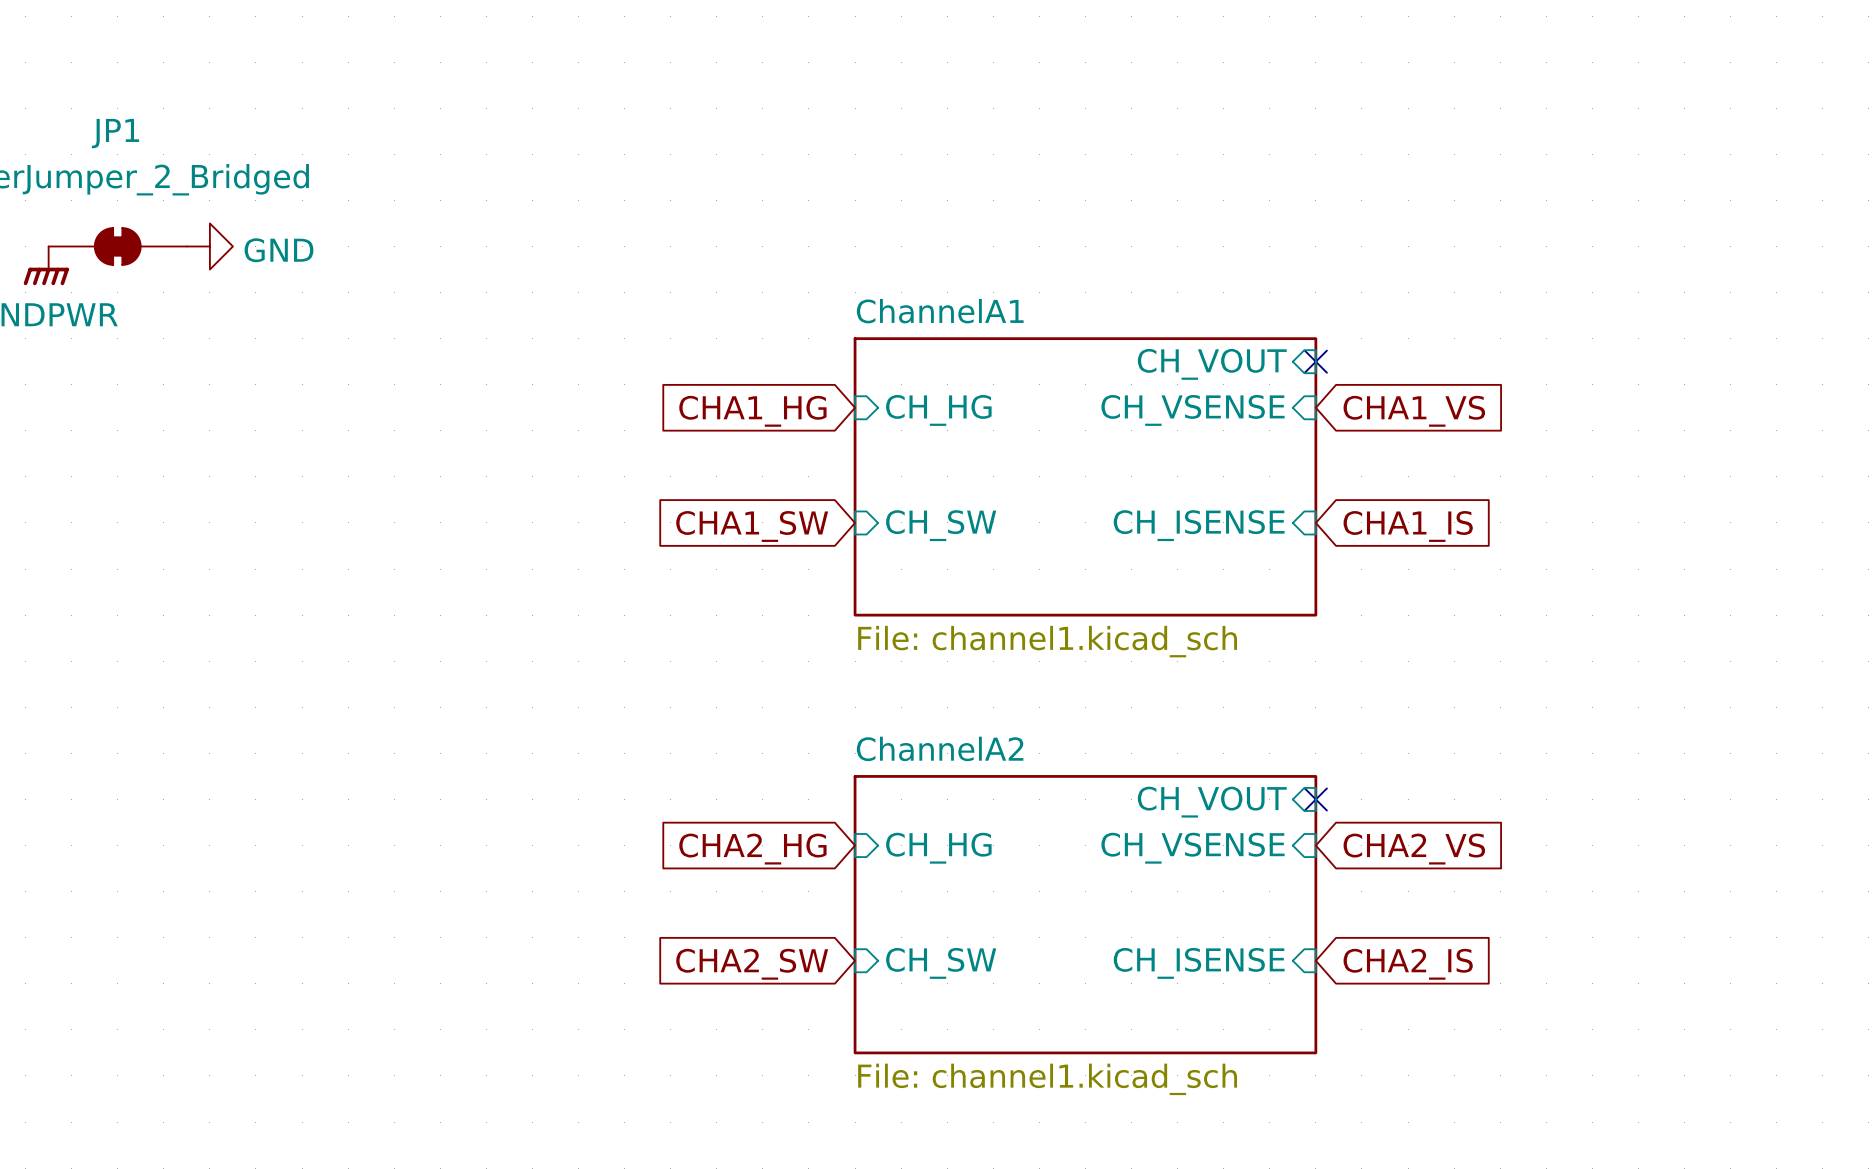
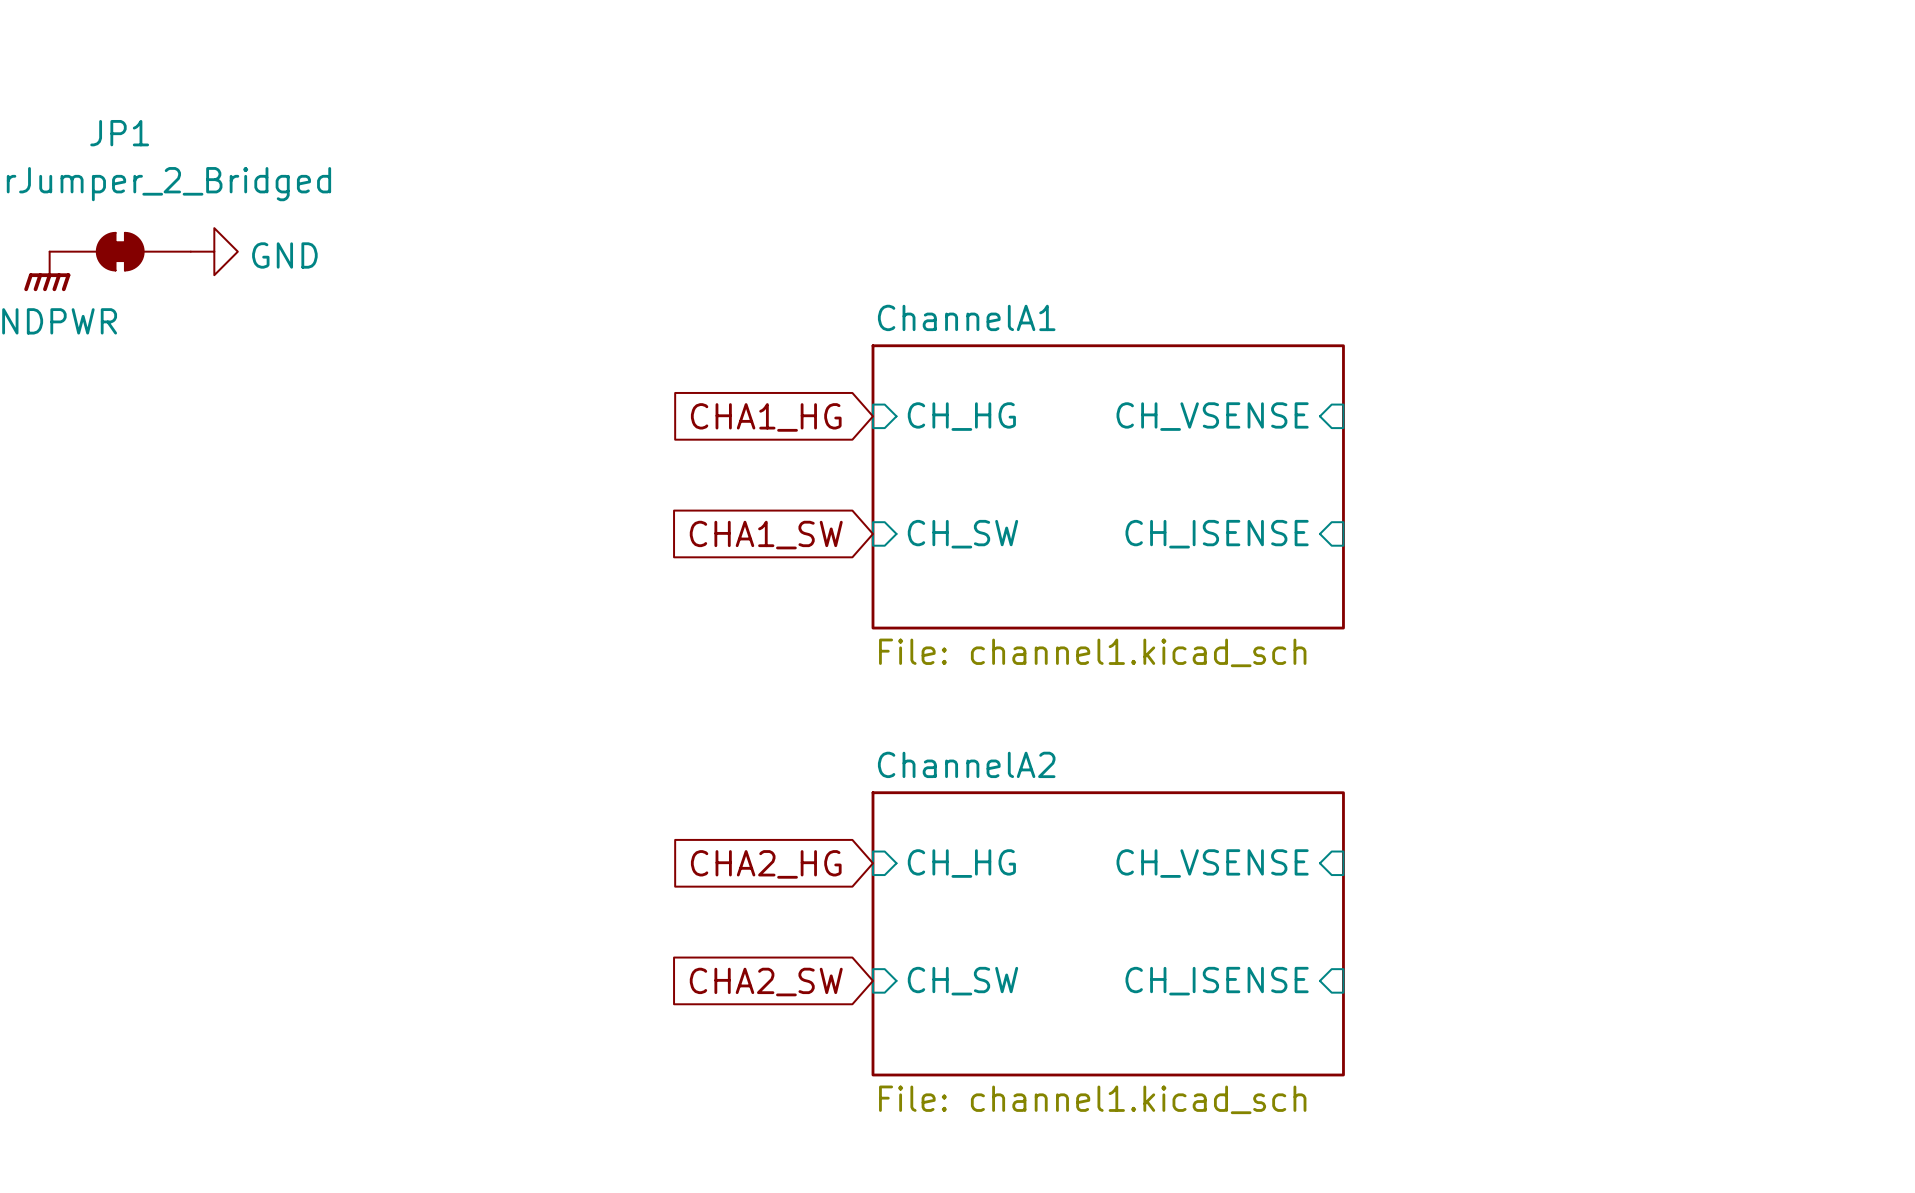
no-connect mark: (1315, 361) -> none
sheet pin: CH_VOUT (1212, 364) -> none
global label: CHA1_VS (1414, 411) -> none
global label: CHA1_IS (1408, 526) -> none
no-connect mark: (1315, 799) -> none
sheet pin: CH_VOUT (1212, 802) -> none
global label: CHA2_VS (1414, 849) -> none
global label: CHA2_IS (1408, 964) -> none

